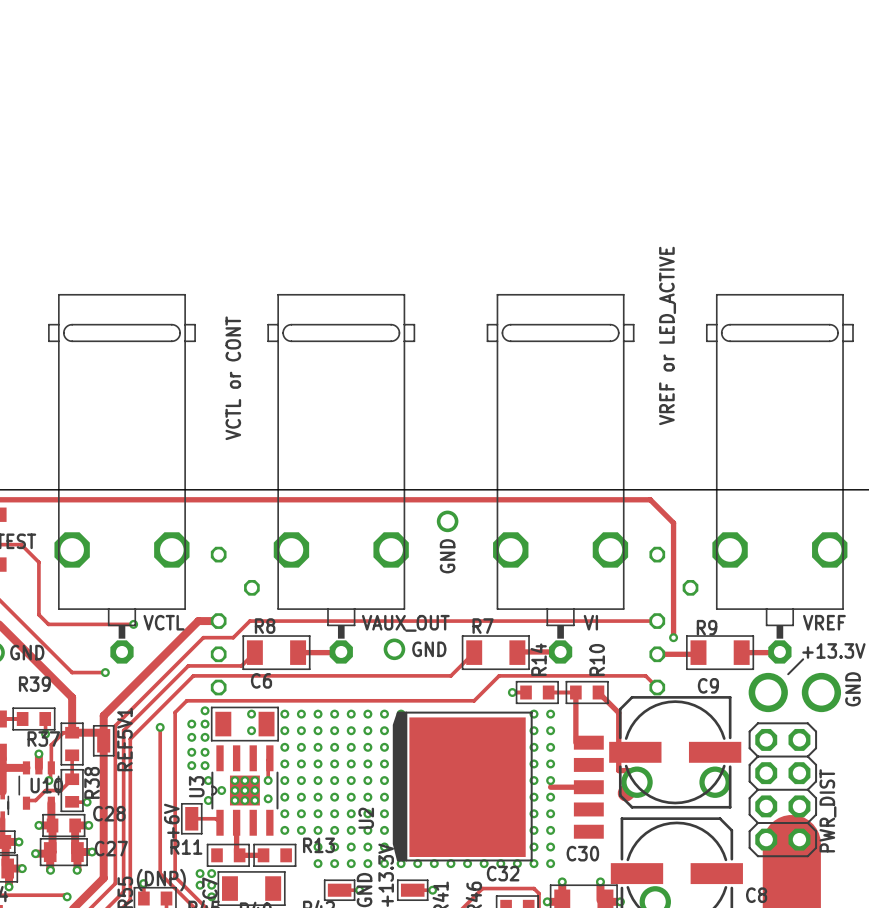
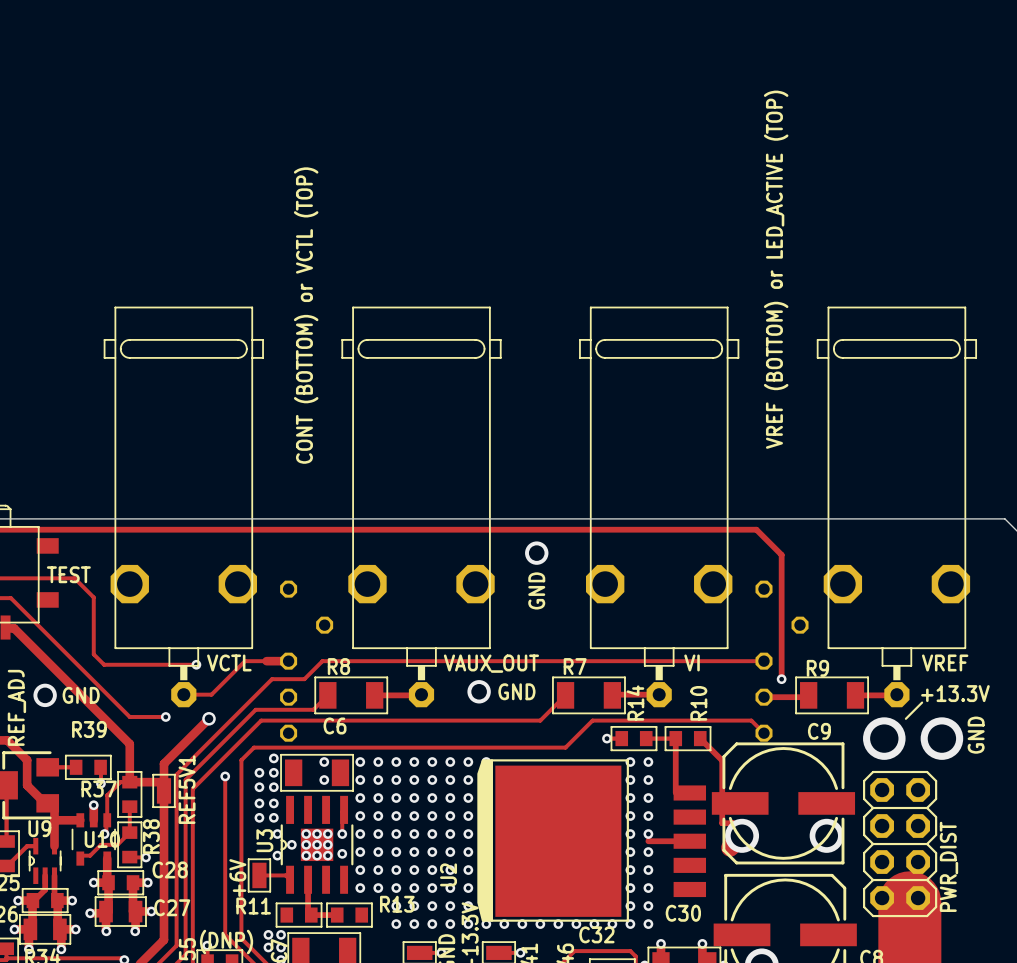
text: VREF or LED_ACTIVE (667, 335) -> VREF (BOTTOM) or LED_ACTIVE (TOP) (776, 269)
text: VCTL or CONT (233, 378) -> CONT (BOTTOM) or VCTL (TOP) (306, 315)
track: (198, 621) (145, 674) -> (266, 661) (245, 661) (211, 694) (183, 694)
via: none -> (209, 718)

